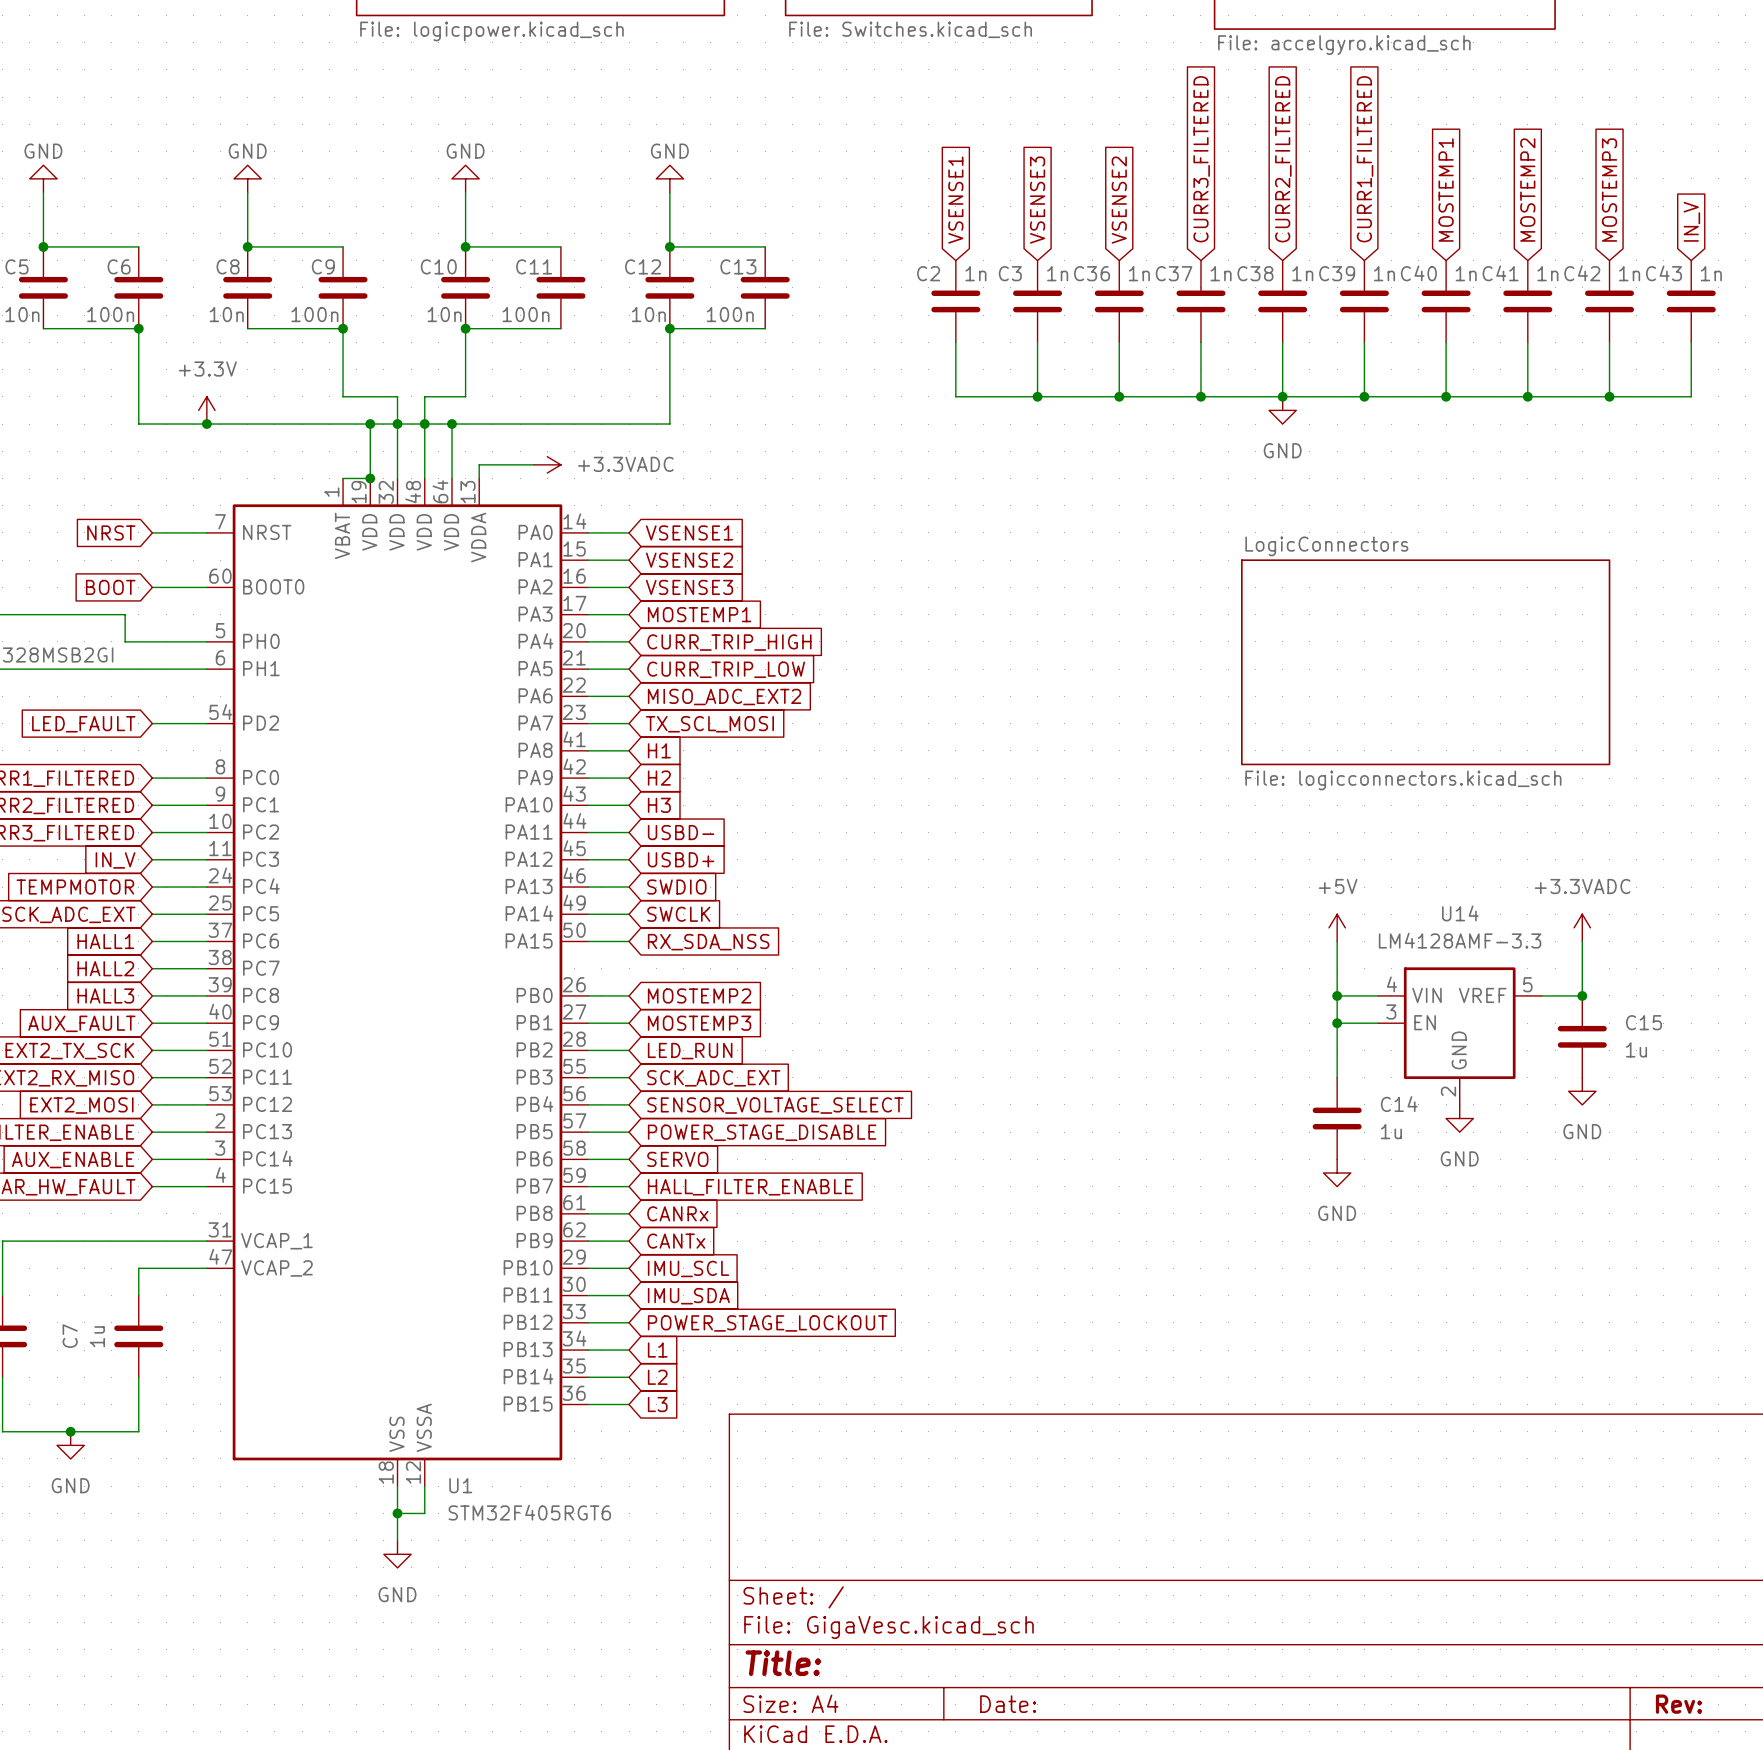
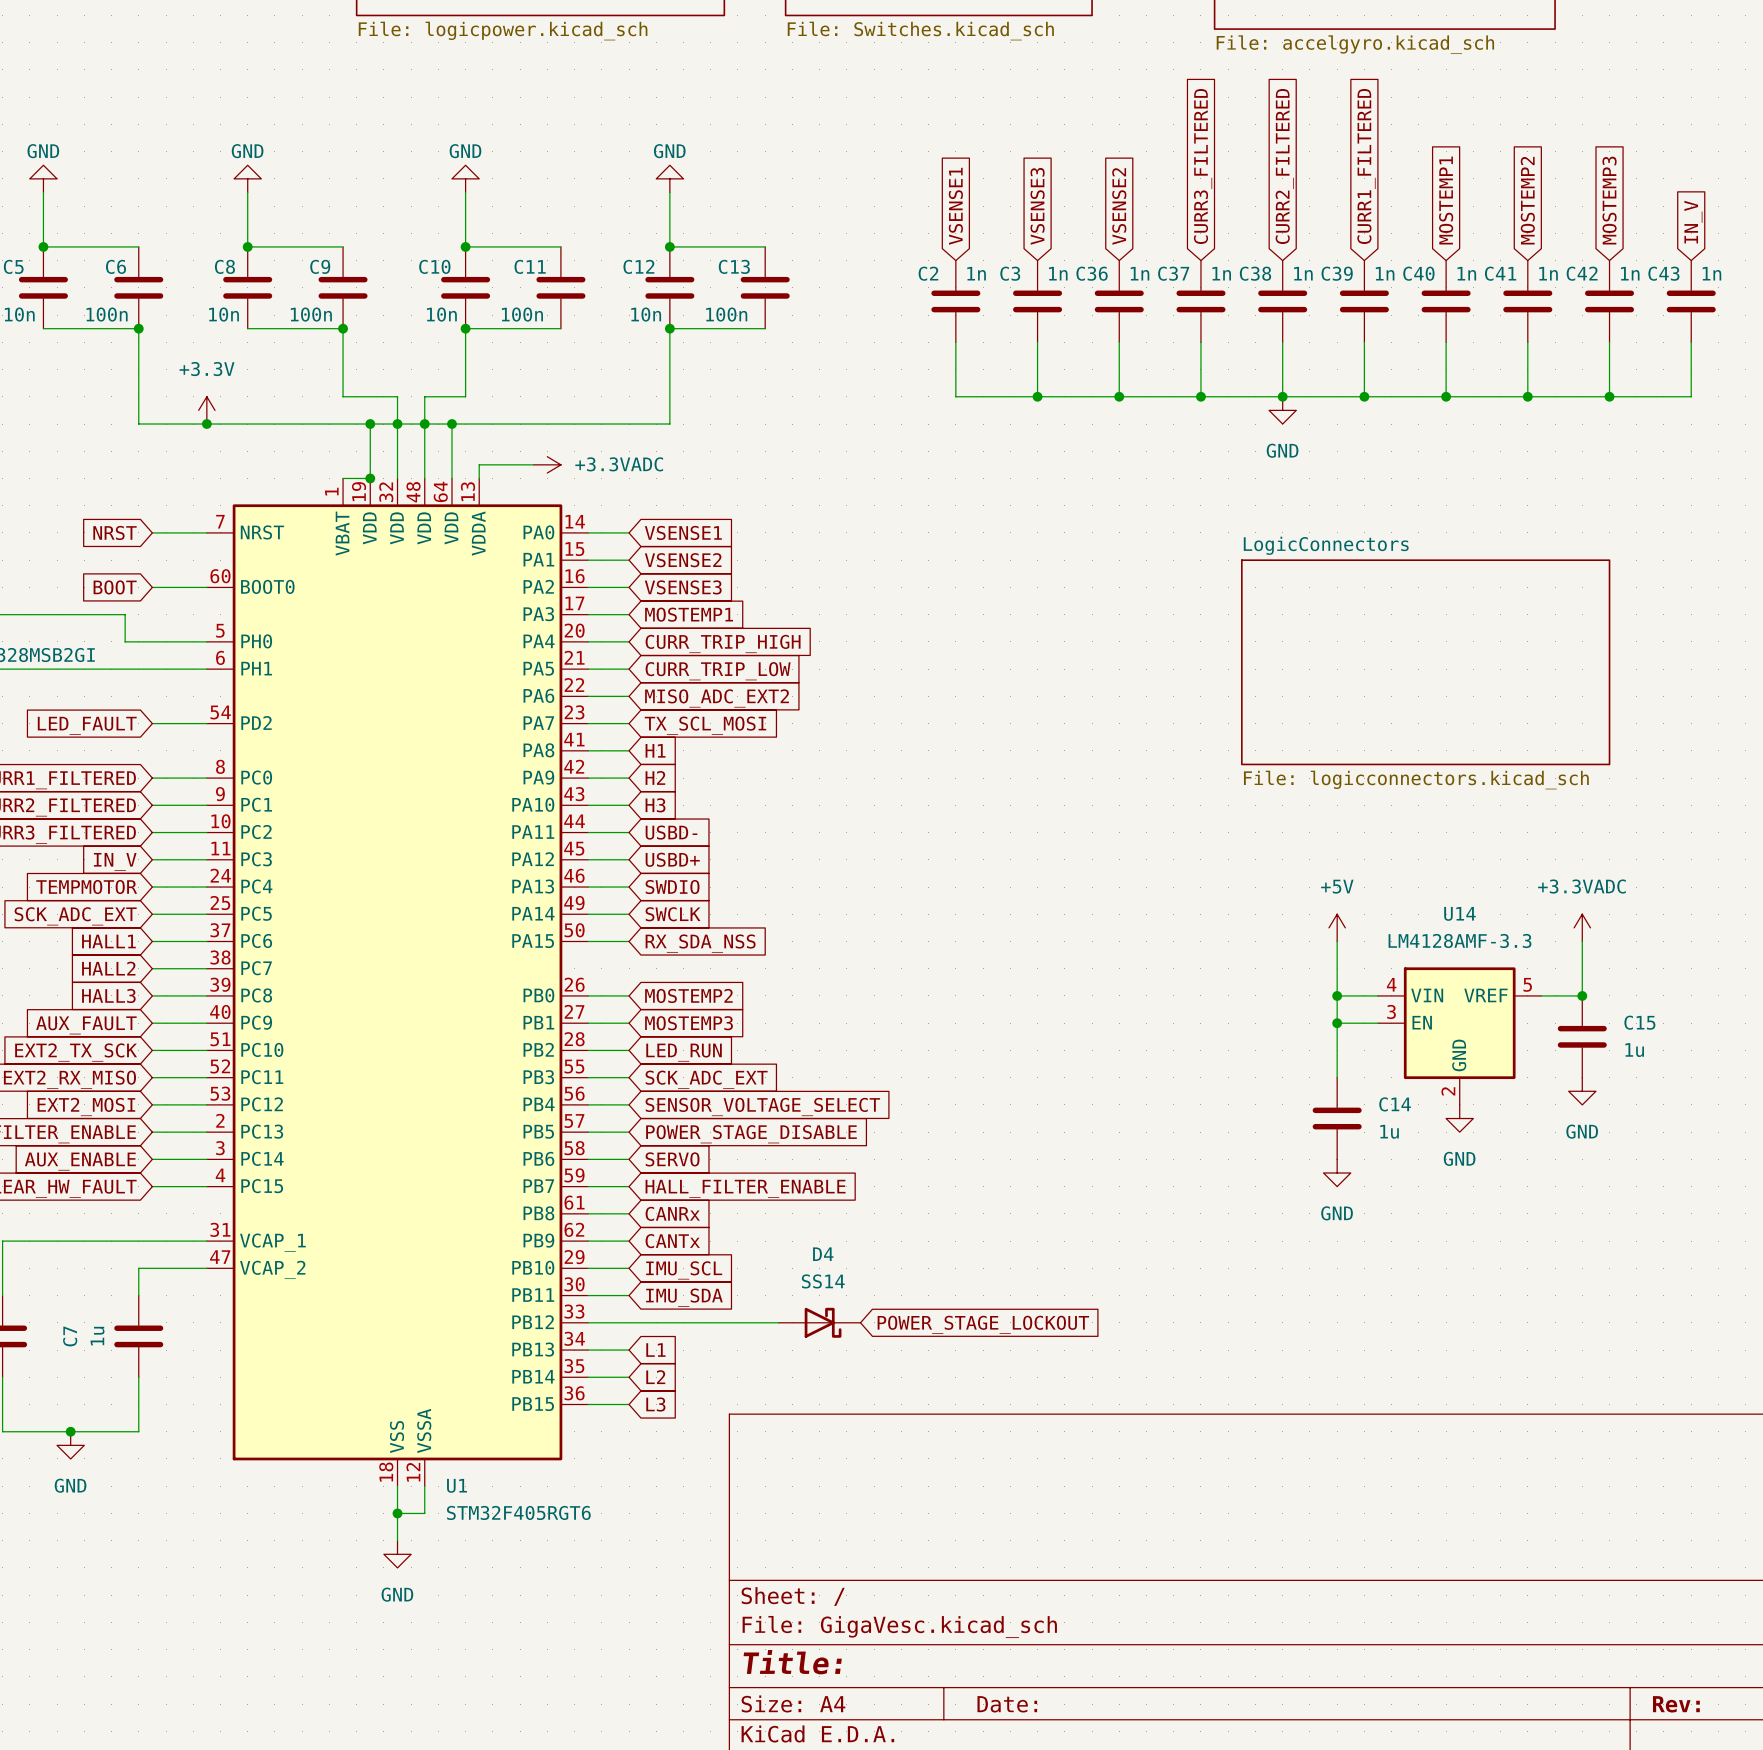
wire: none -> (629, 1322) (778, 1322)
D4: none -> SS14 (819, 1322)
global label position: POWER_STAGE_LOCKOUT (767, 1323) -> POWER_STAGE_LOCKOUT (983, 1324)

